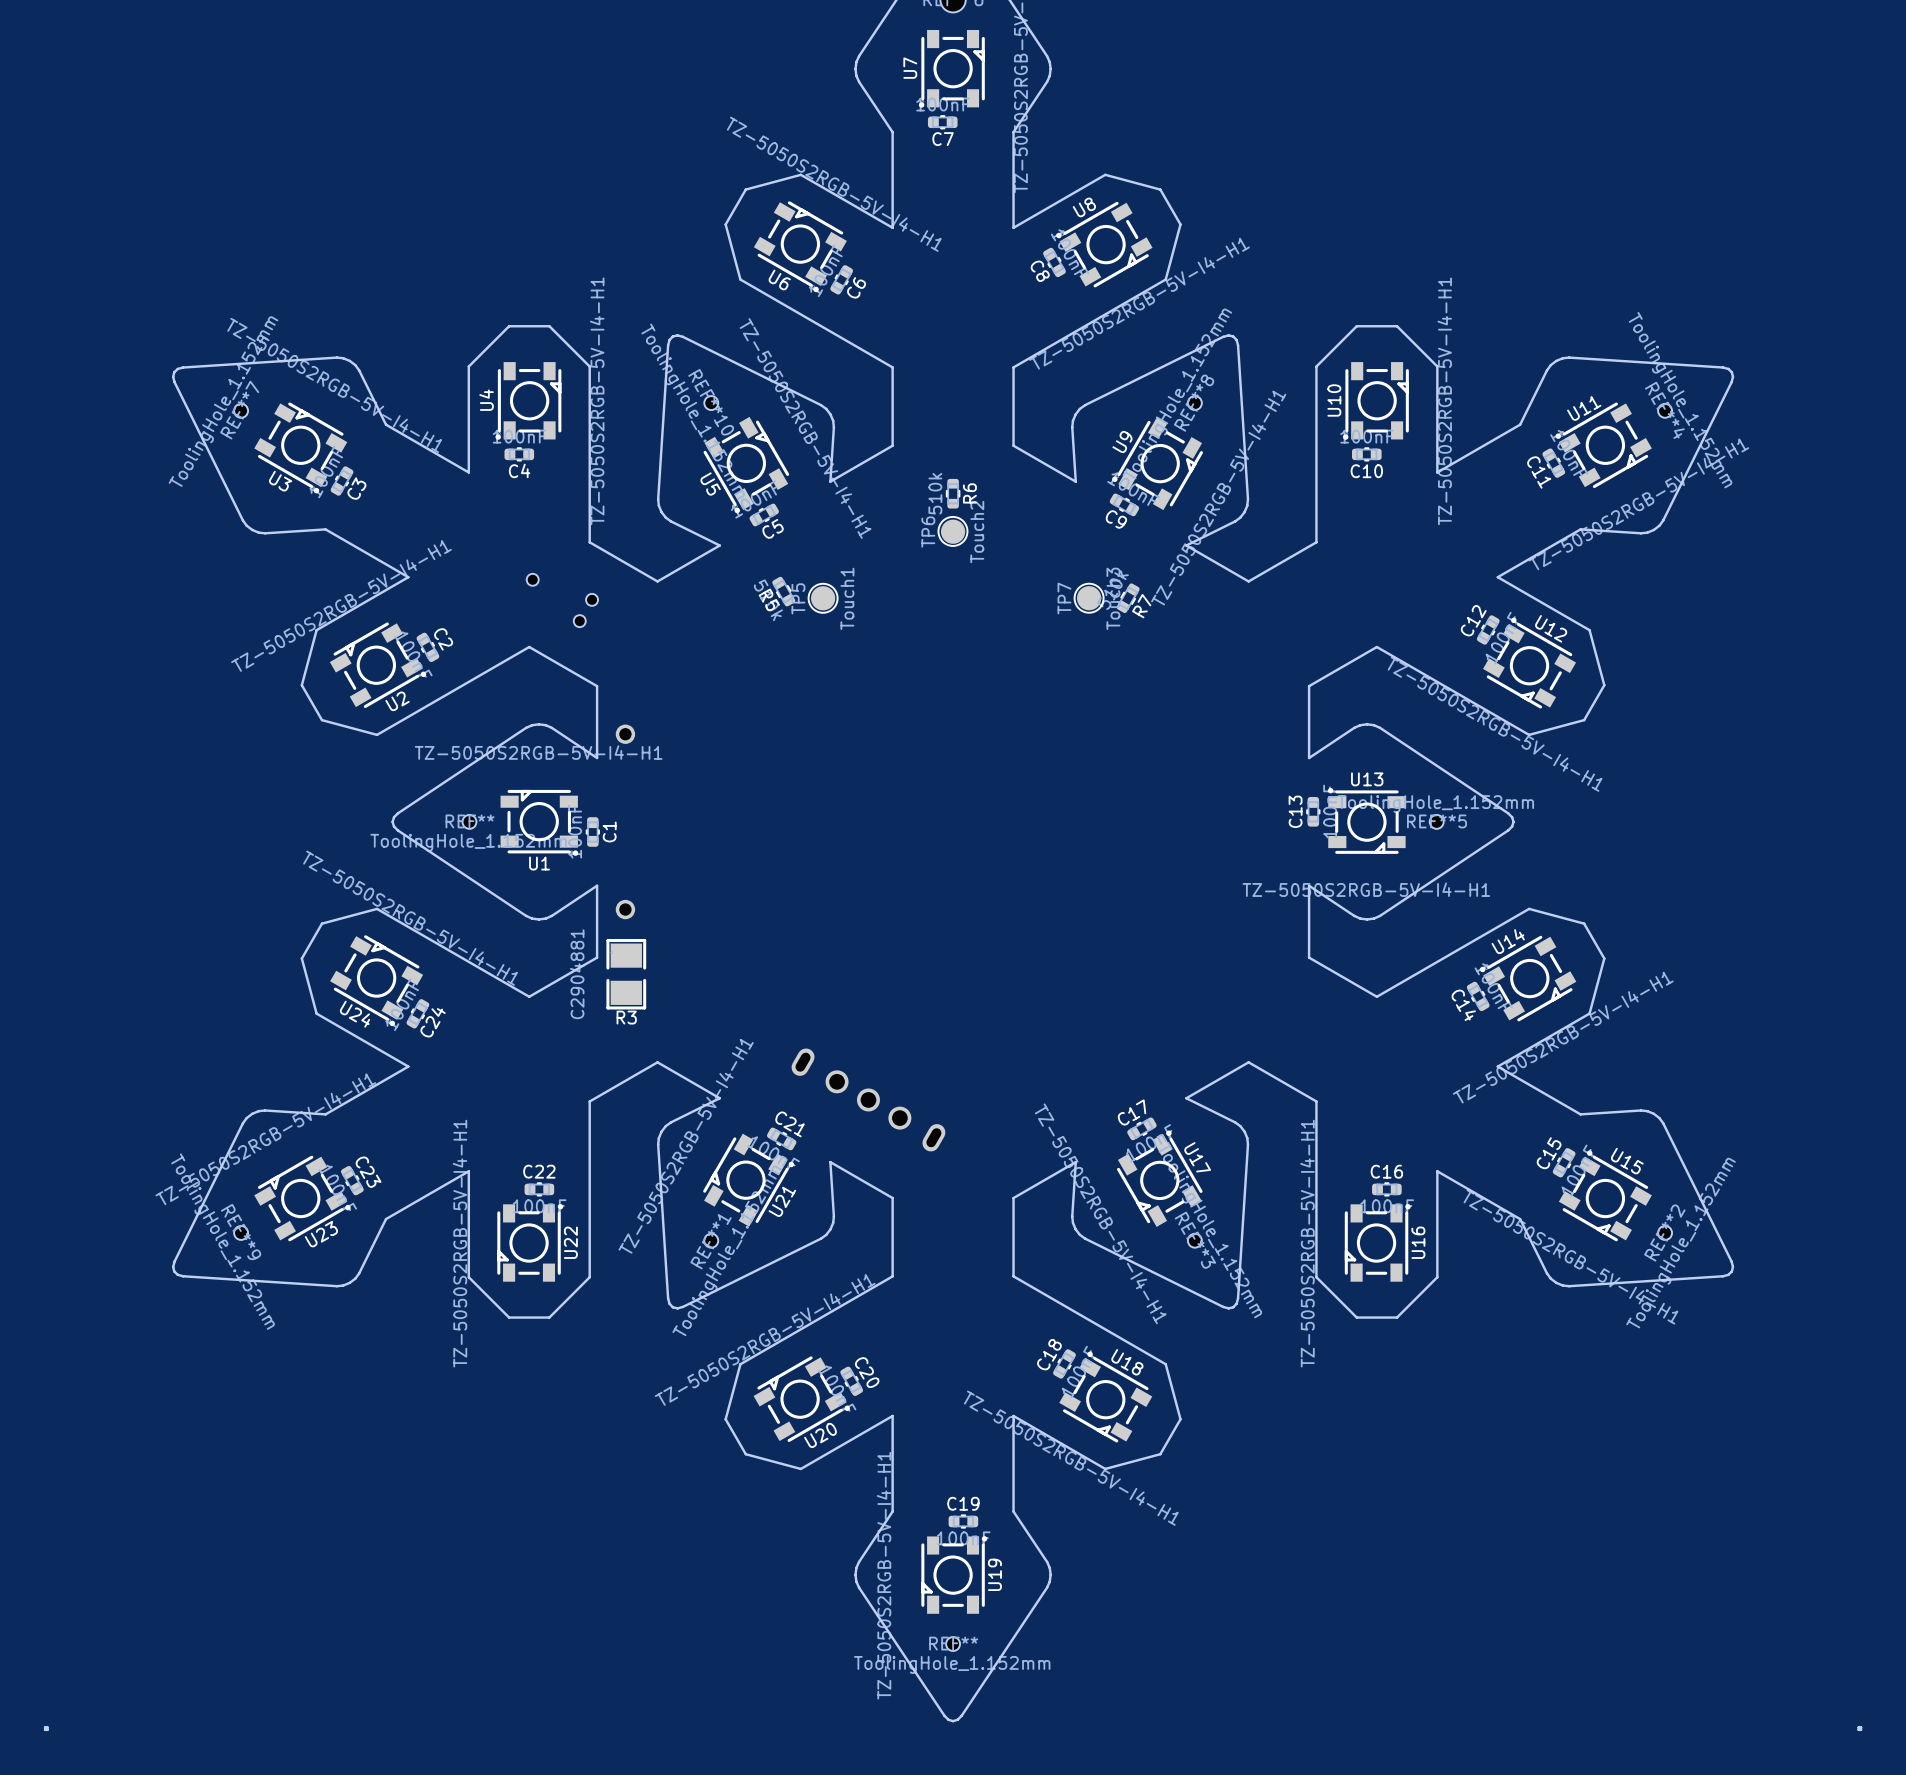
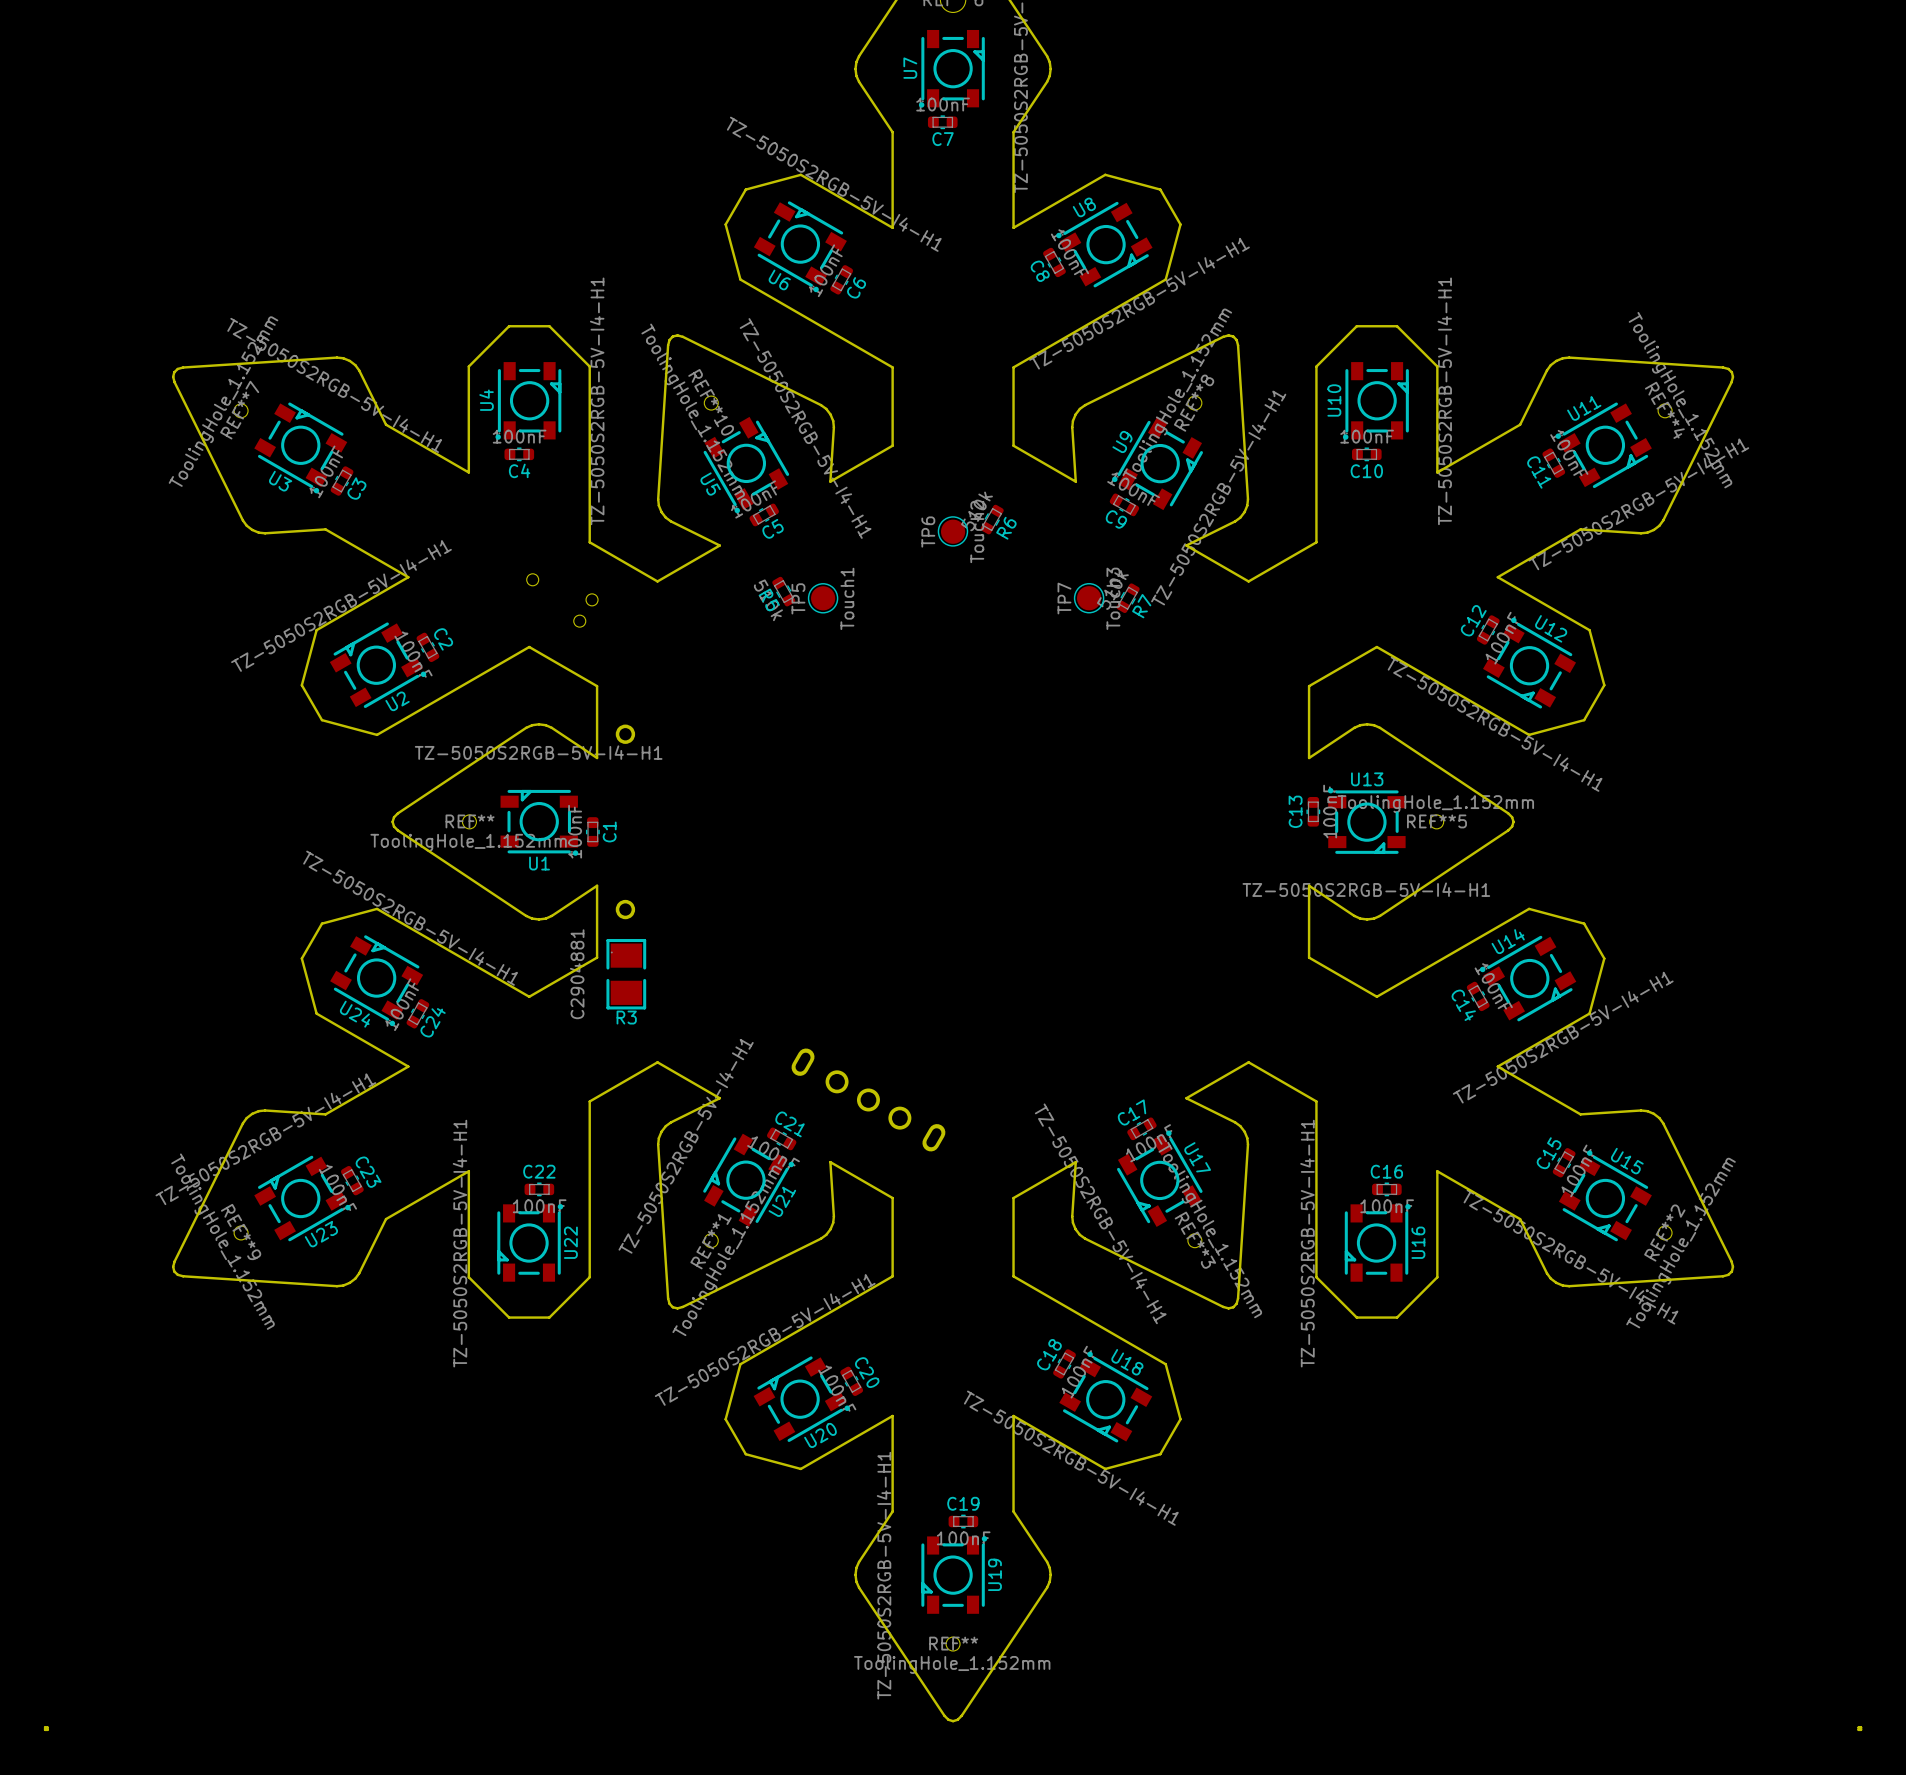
R6 rotation: 0° (953, 493) -> 30° clockwise (992, 519)
R6 position: (953, 493) -> (992, 519)

